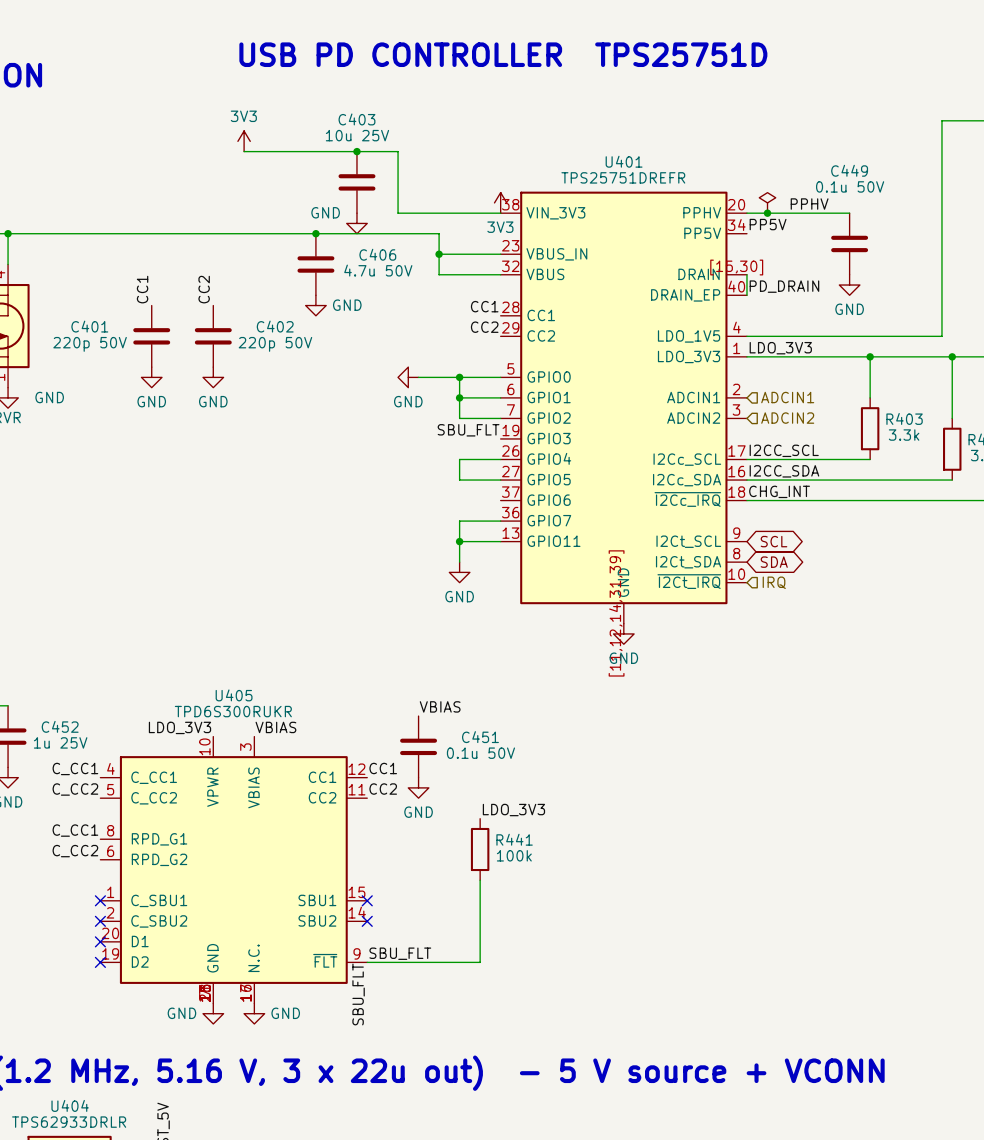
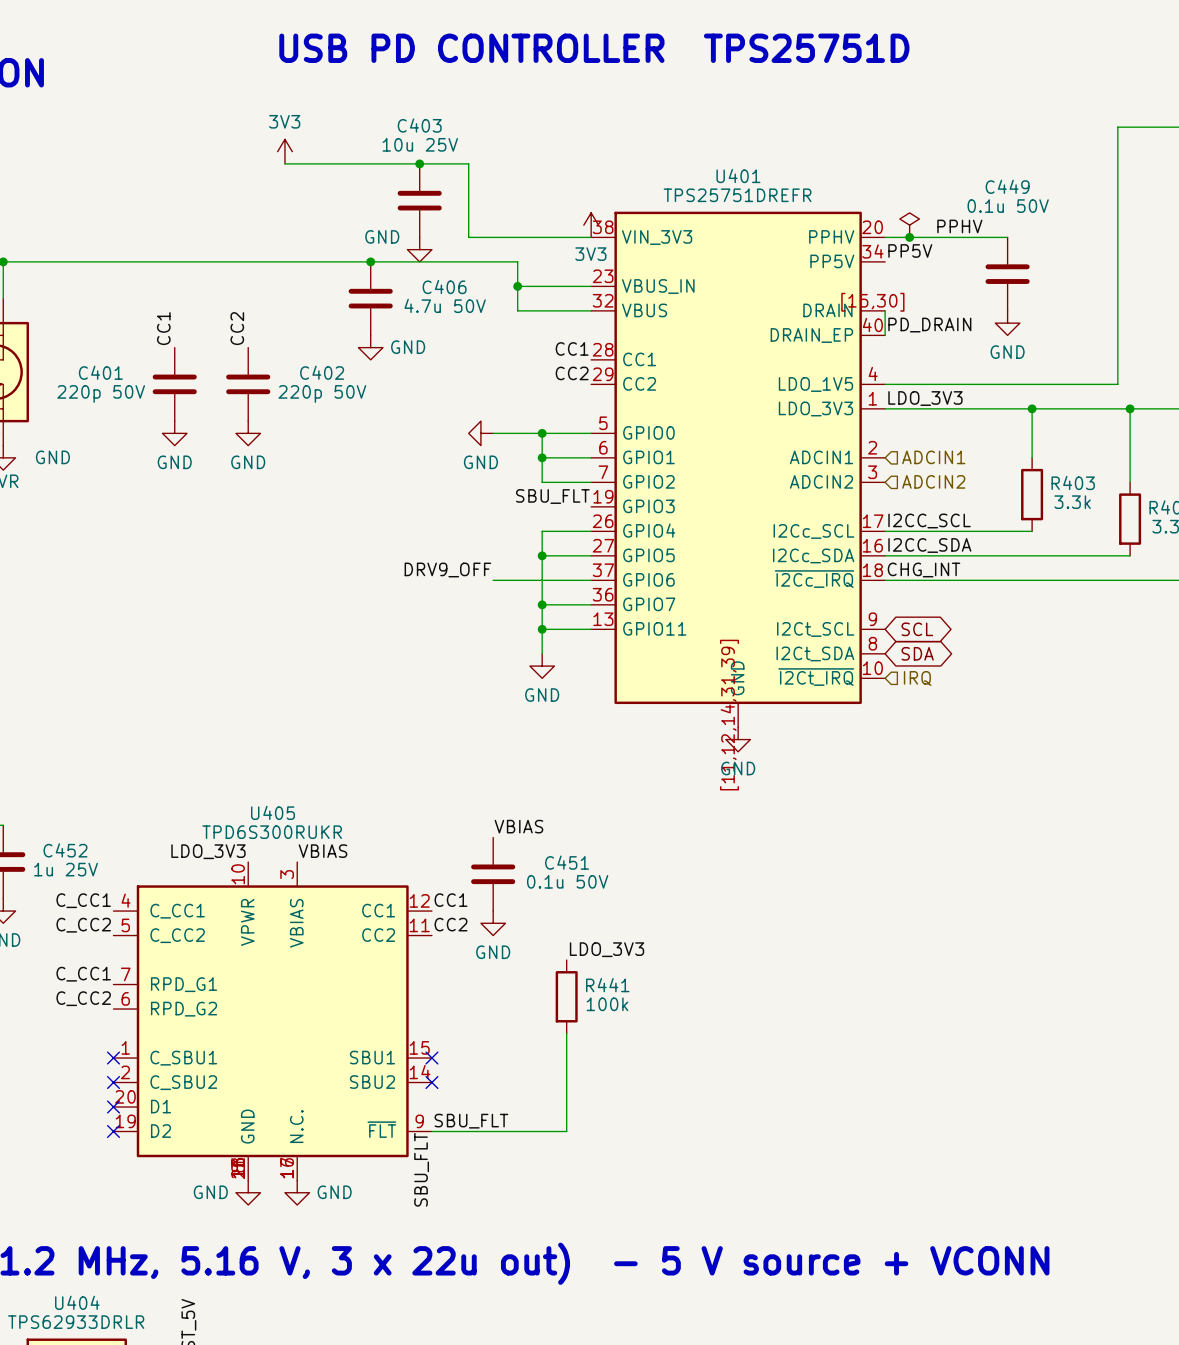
wire: none -> (542, 555) (542, 604)
junction: none -> (542, 555)
label: none -> DRV9_OFF (447, 569)
wire: none -> (493, 580) (591, 580)
junction: none -> (542, 604)
U405 symbol: [100, 736, 368, 1004] -> [113, 862, 432, 1181]

